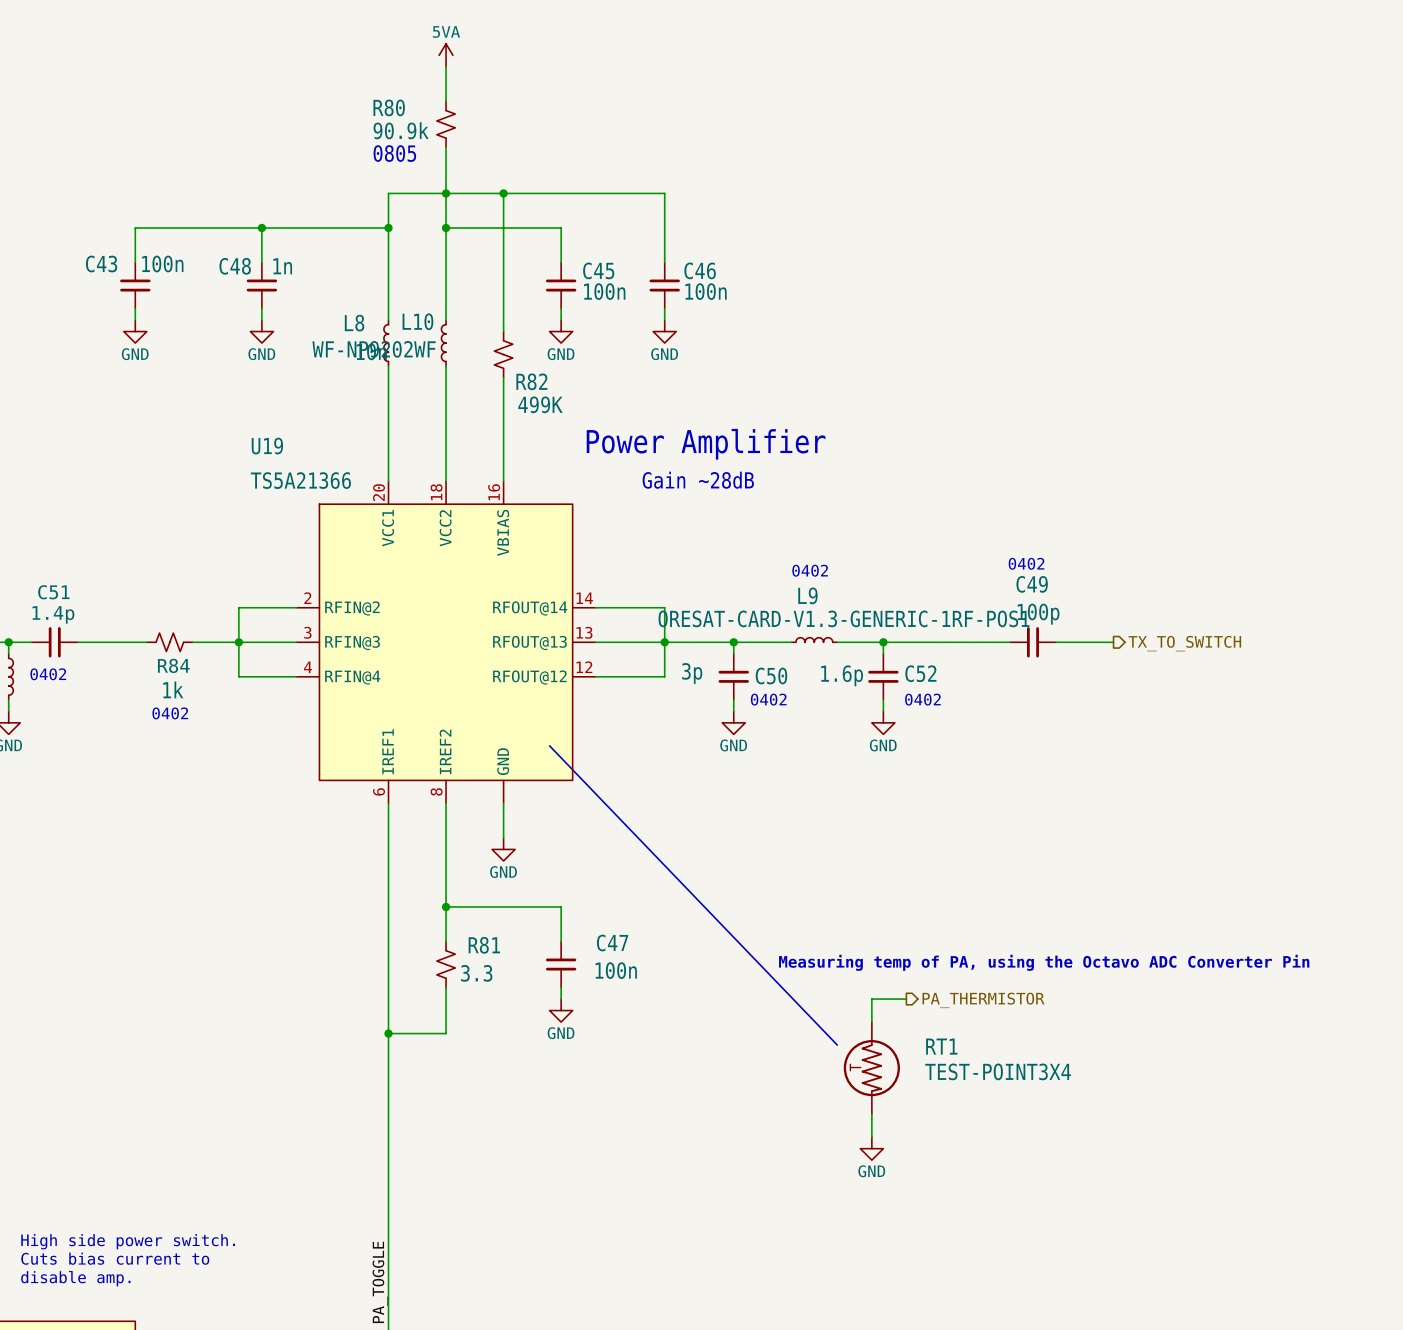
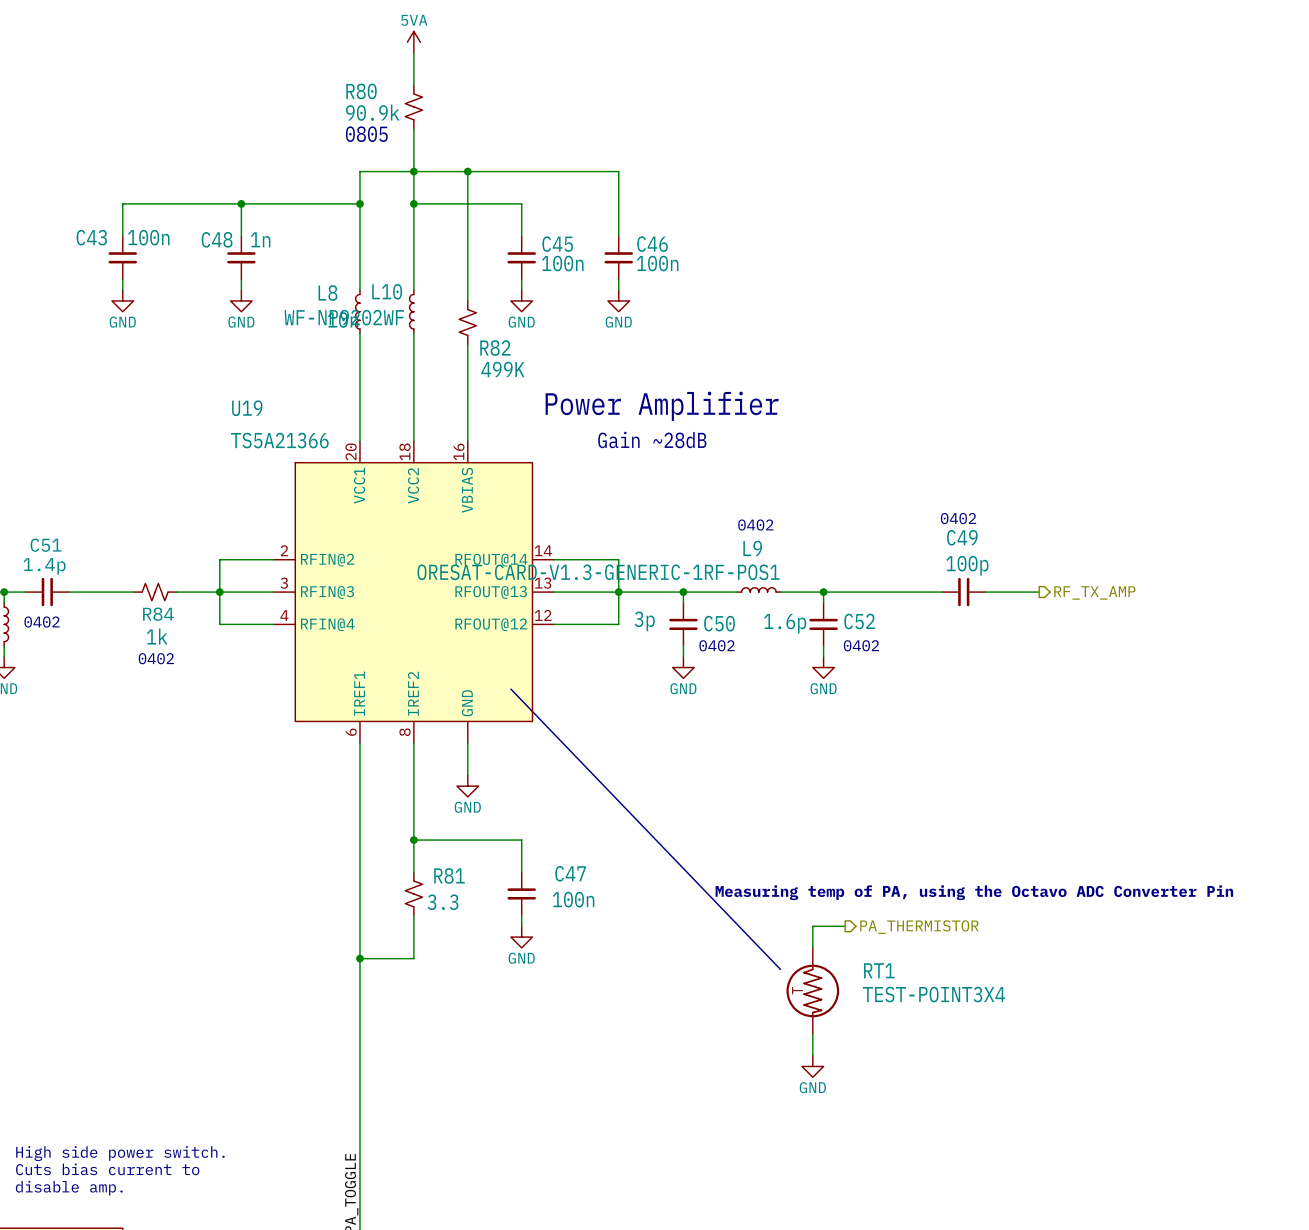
L9 value position: ORESAT-CARD-V1.3-GENERIC-1RF-POS1 (843, 618) -> ORESAT-CARD-V1.3-GENERIC-1RF-POS1 (598, 572)
hierarchical label: TX_TO_SWITCH (1184, 643) -> RF_TX_AMP (1094, 592)

